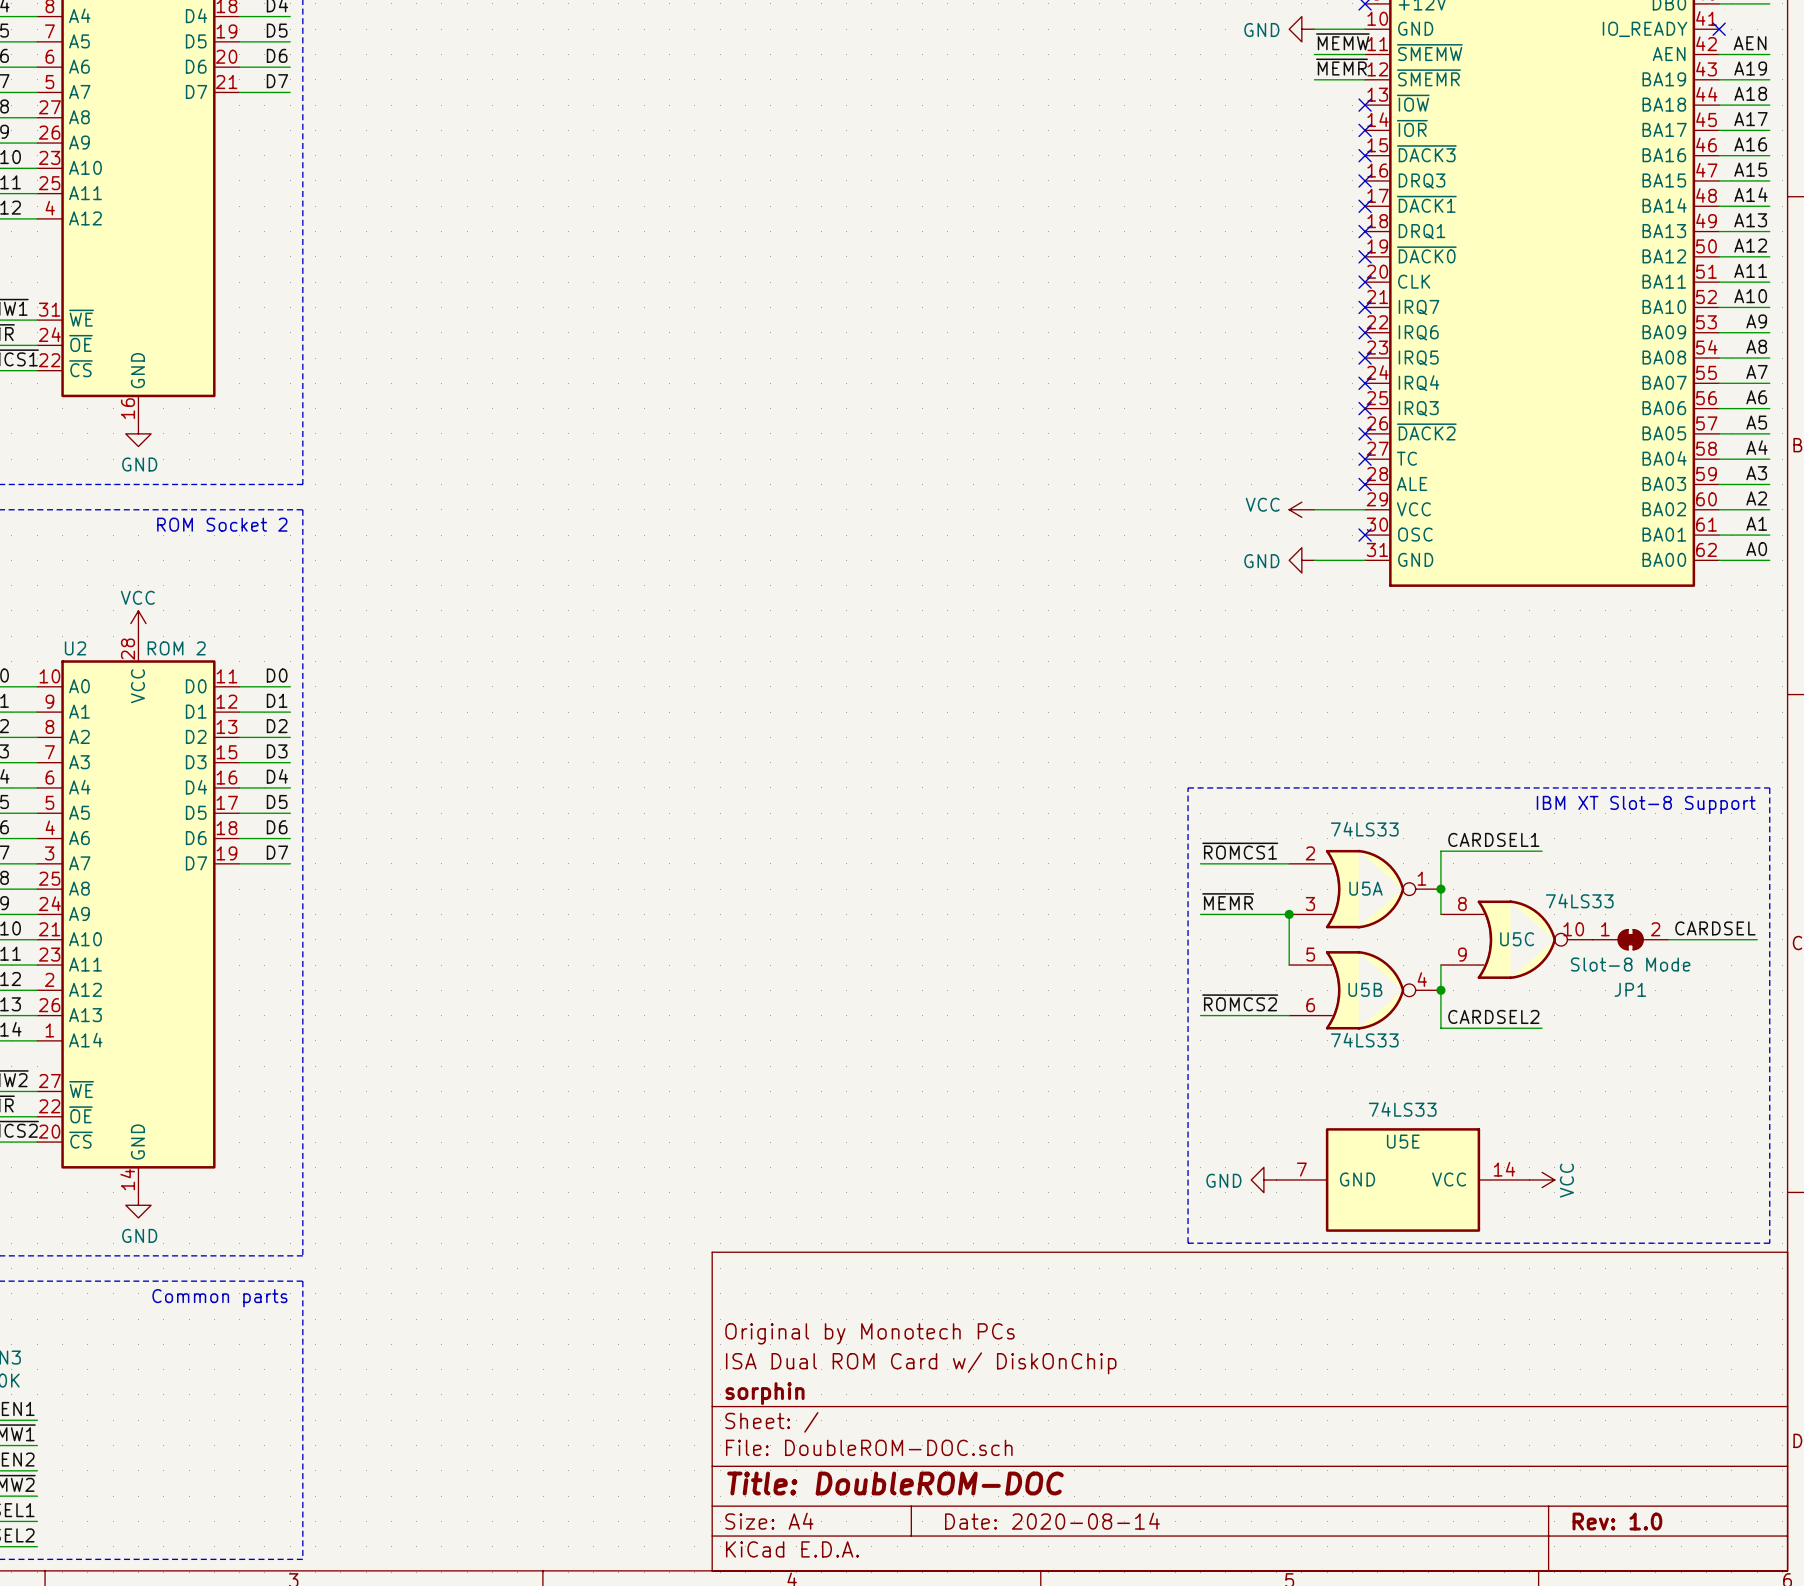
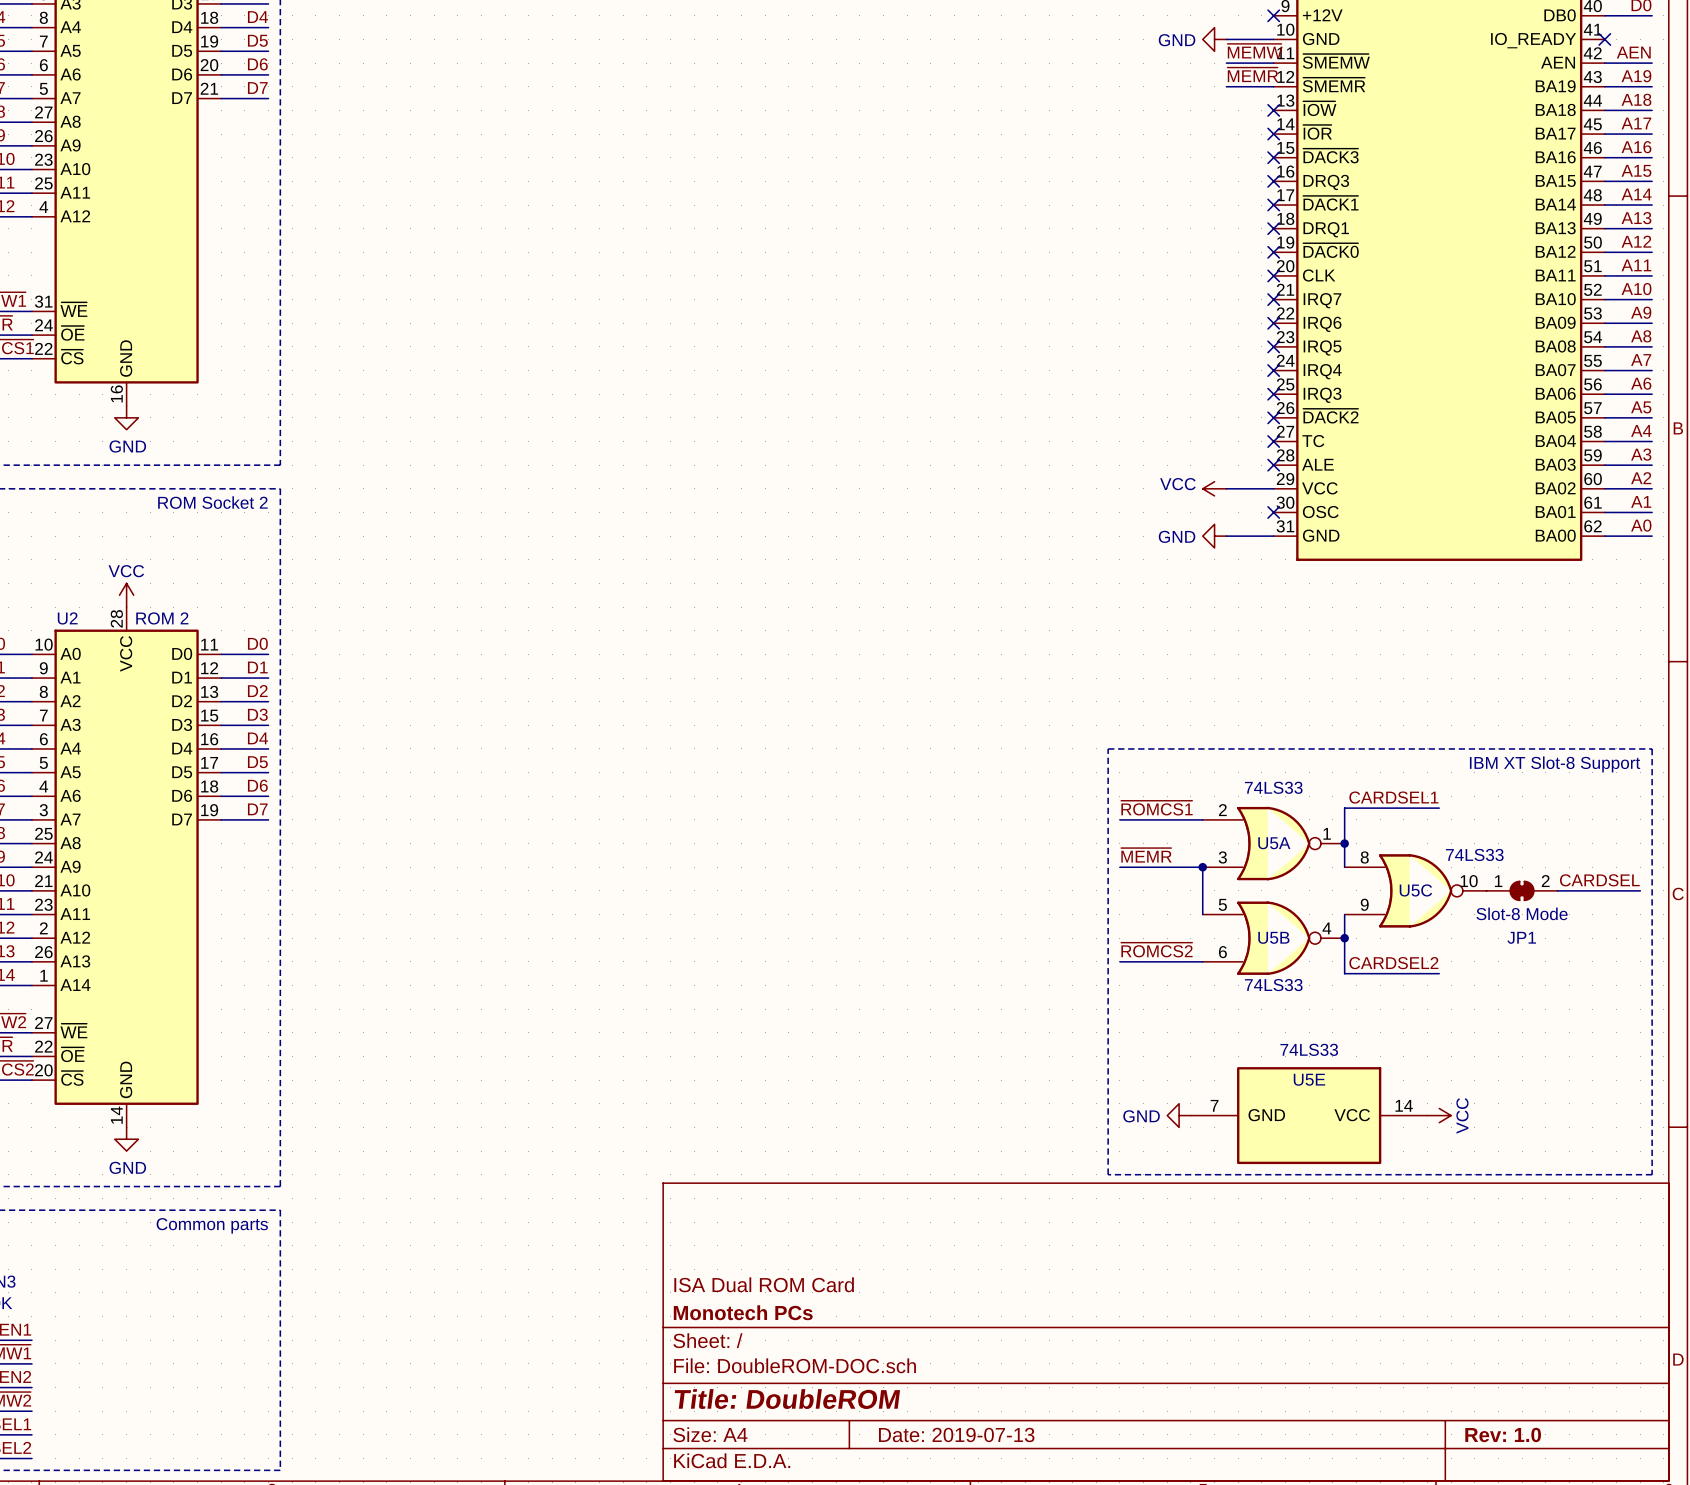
title block: Original by Monotech PCs (870, 1333) -> none
title block: ISA Dual ROM Card w/ DiskOnChip (921, 1363) -> ISA Dual ROM Card (764, 1284)
title block: sorphin (765, 1393) -> Monotech PCs (743, 1312)
title block: Title: DoubleROM-DOC (895, 1483) -> Title: DoubleROM (787, 1399)
title block: Date: 2020-08-14 (1052, 1521) -> Date: 2019-07-13 (956, 1434)

